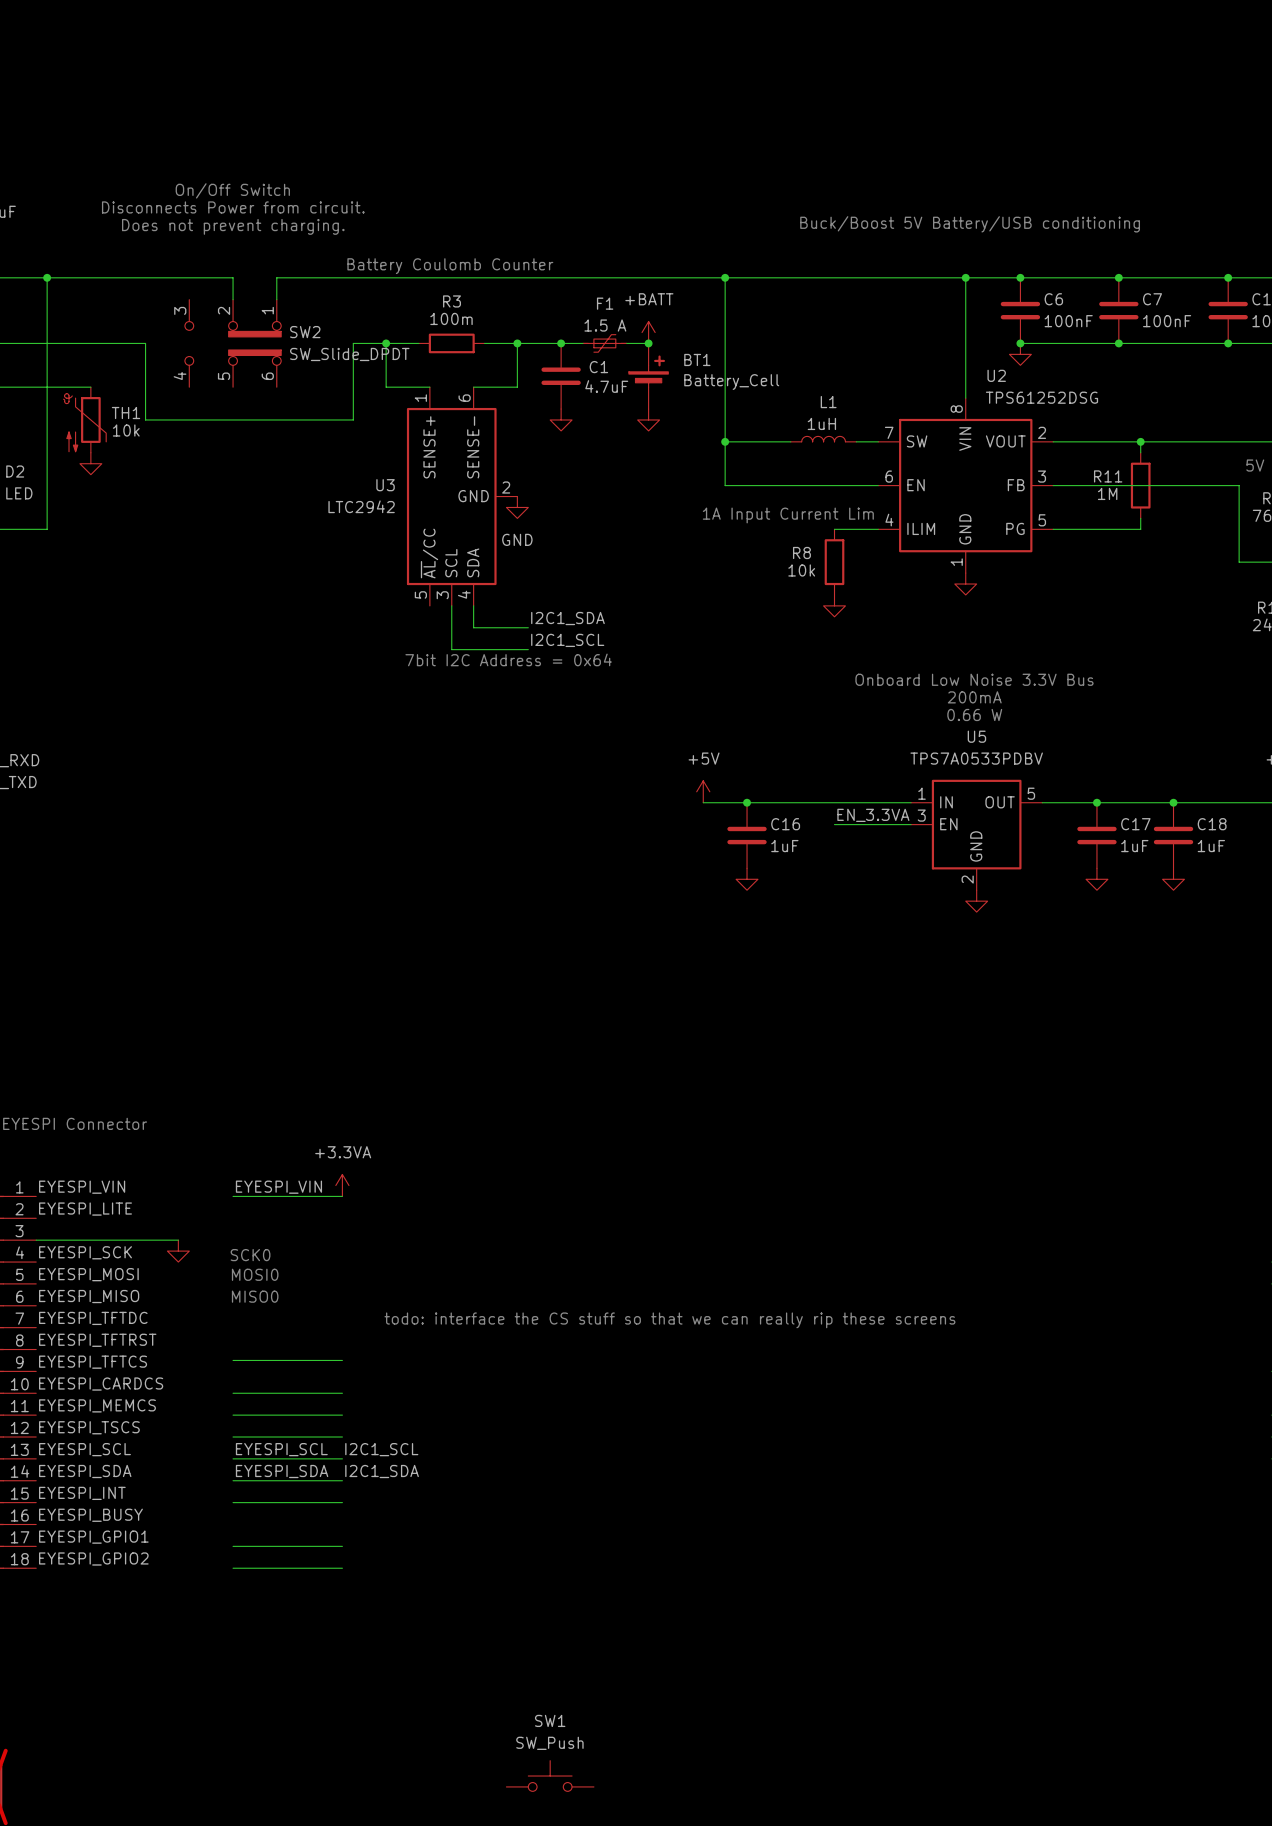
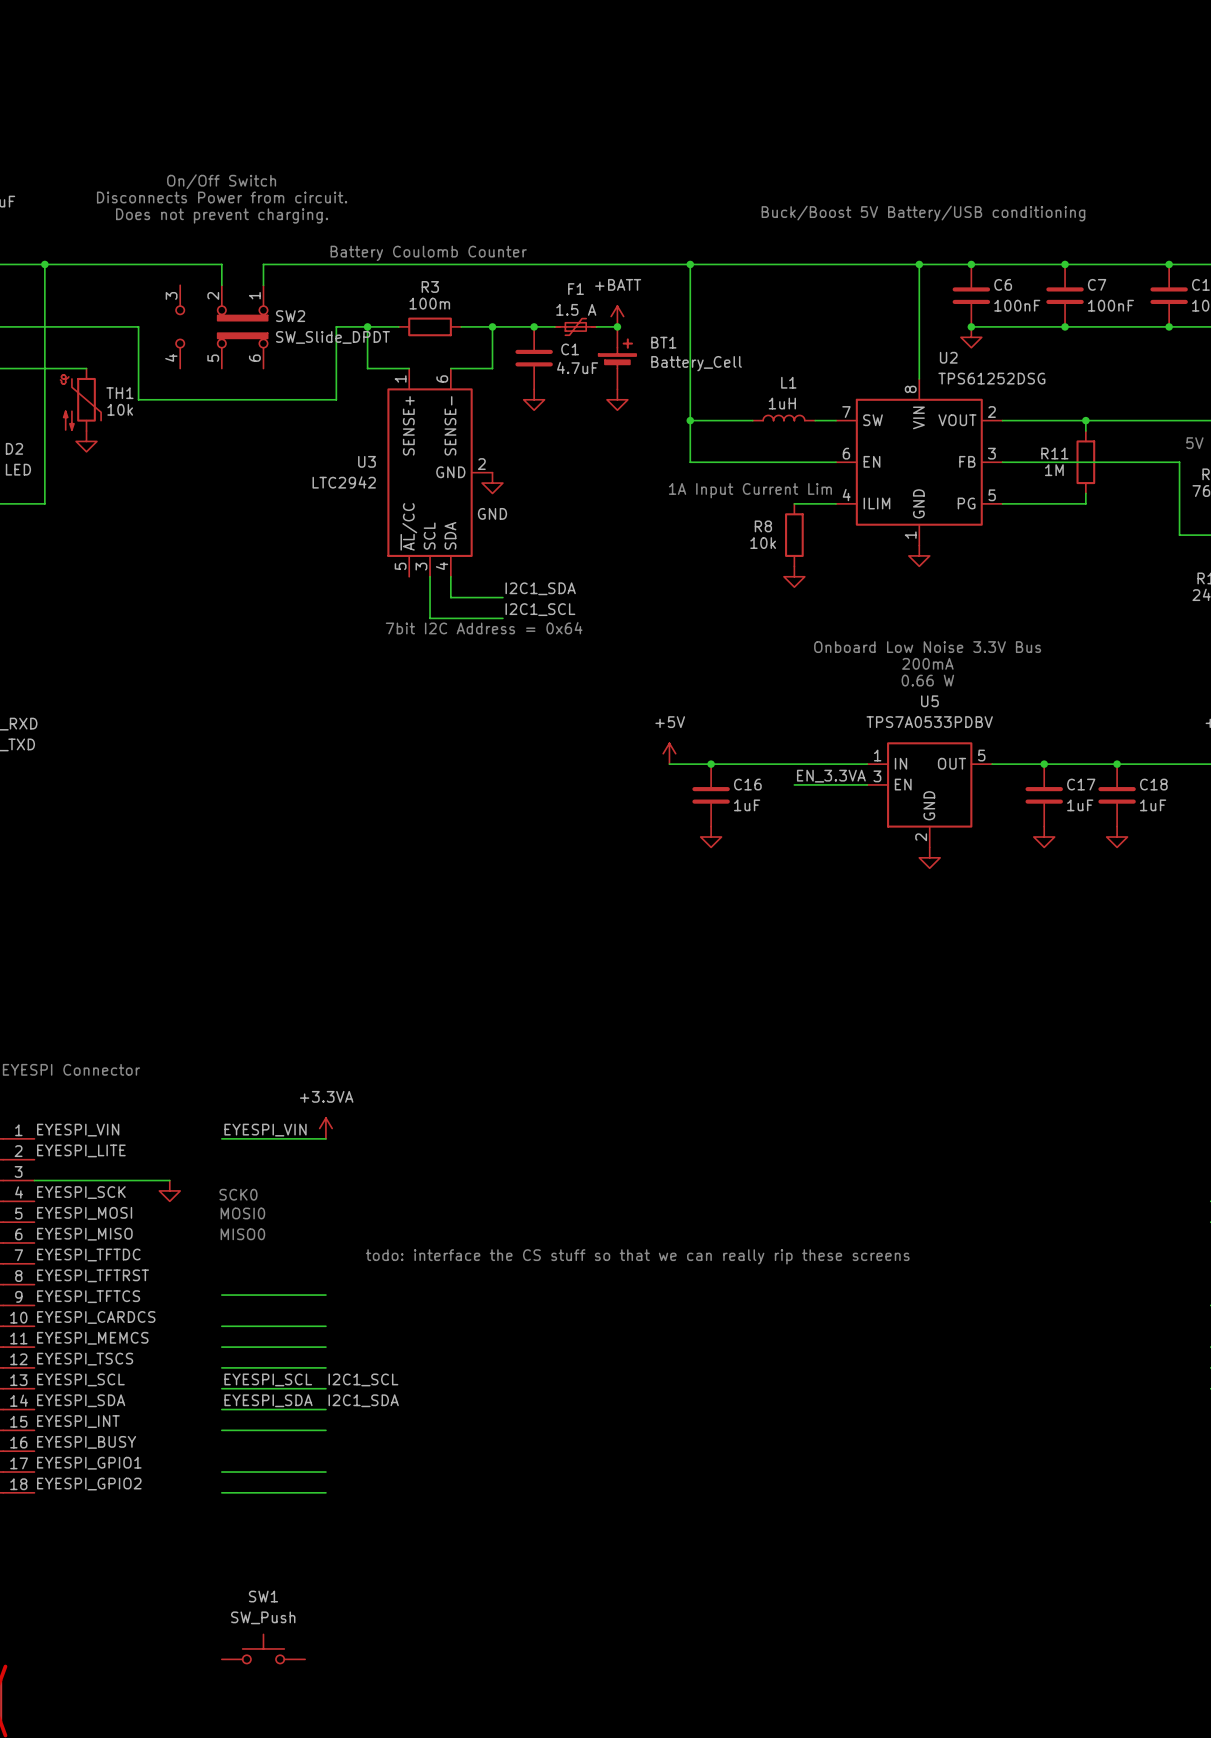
SW1 position: (550, 1776) -> (263, 1648)

